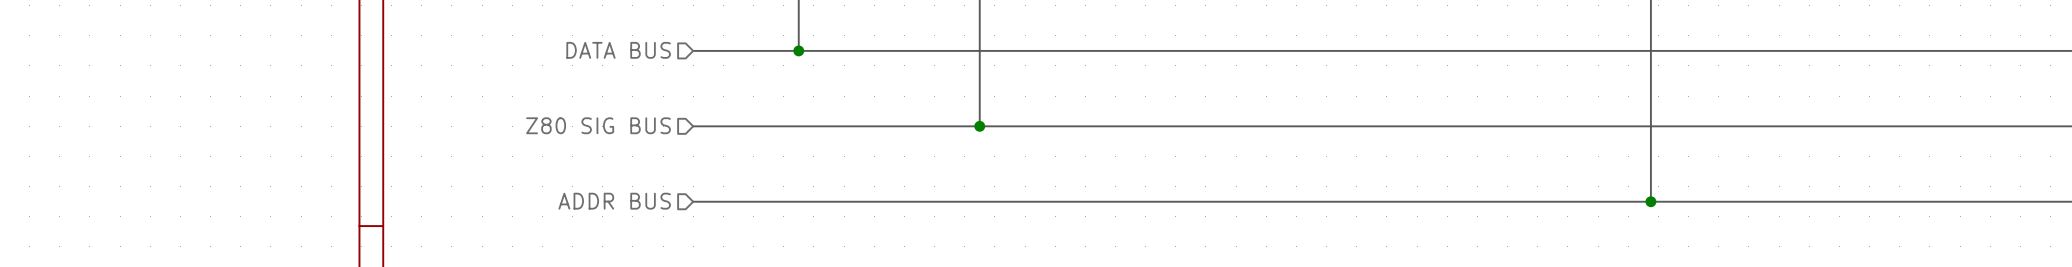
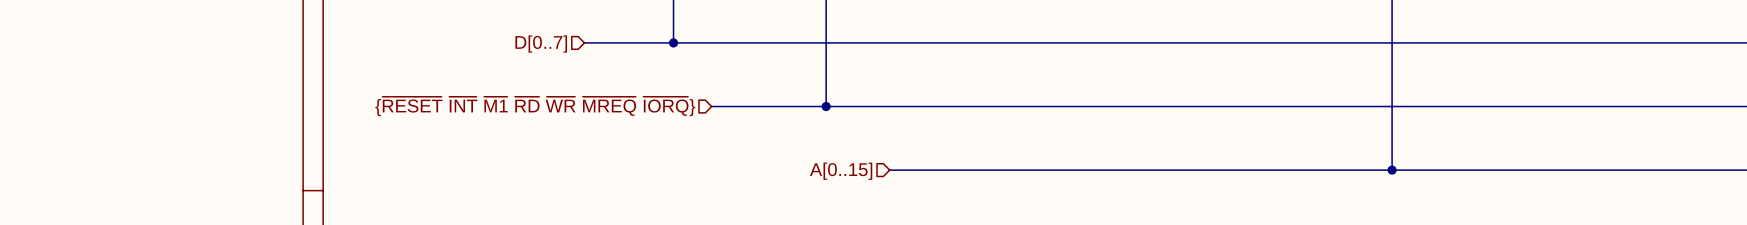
hierarchical label: DATA BUS (618, 50) -> D[0..7] (541, 44)
hierarchical label: Z80 SIG BUS (598, 125) -> none
hierarchical label: none -> {~{RESET} ~{INT} ~{M1} ~{RD} ~{WR} ~{MREQ} ~{IORQ}} (535, 106)
bus: (693, 126) (844, 126) -> none
hierarchical label: ADDR BUS (614, 201) -> none
bus: (693, 201) (1055, 201) -> none
hierarchical label: none -> A[0..15] (841, 171)

